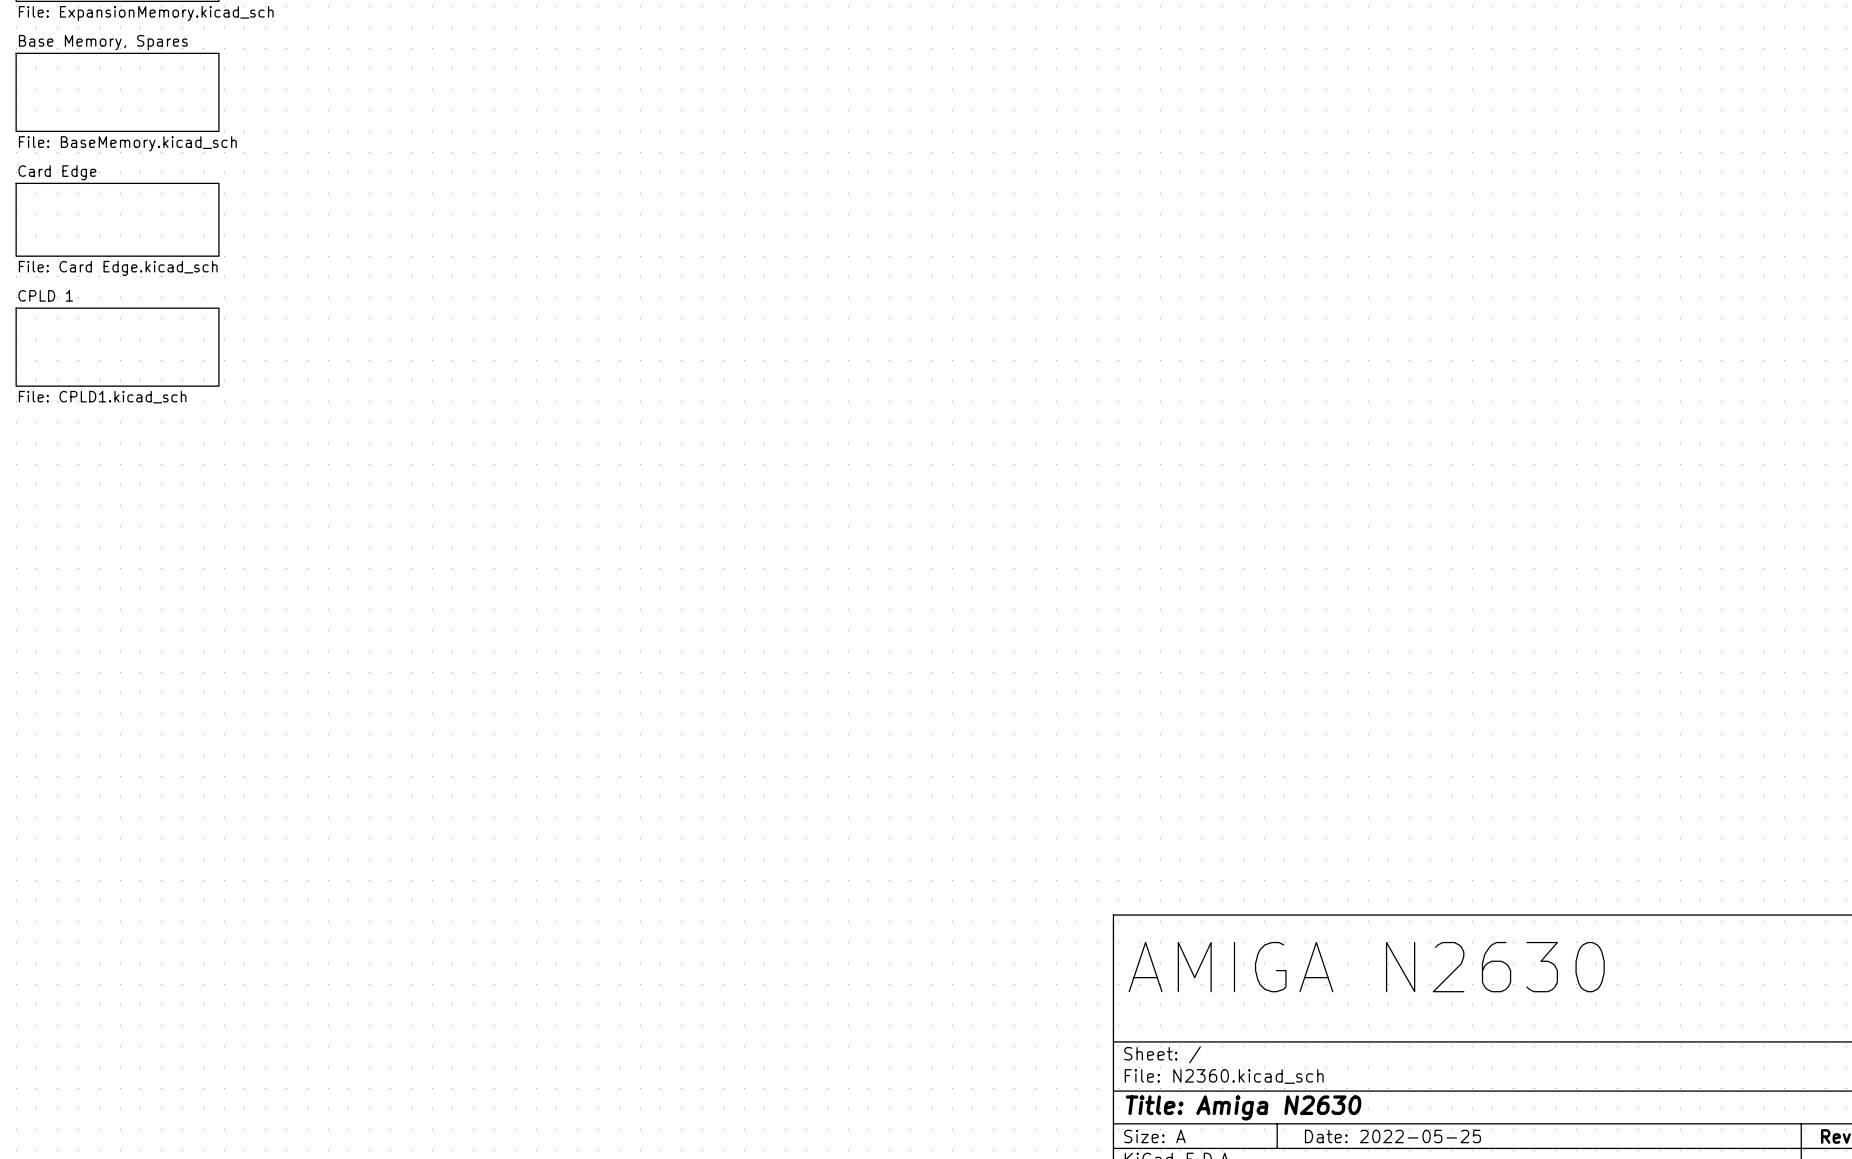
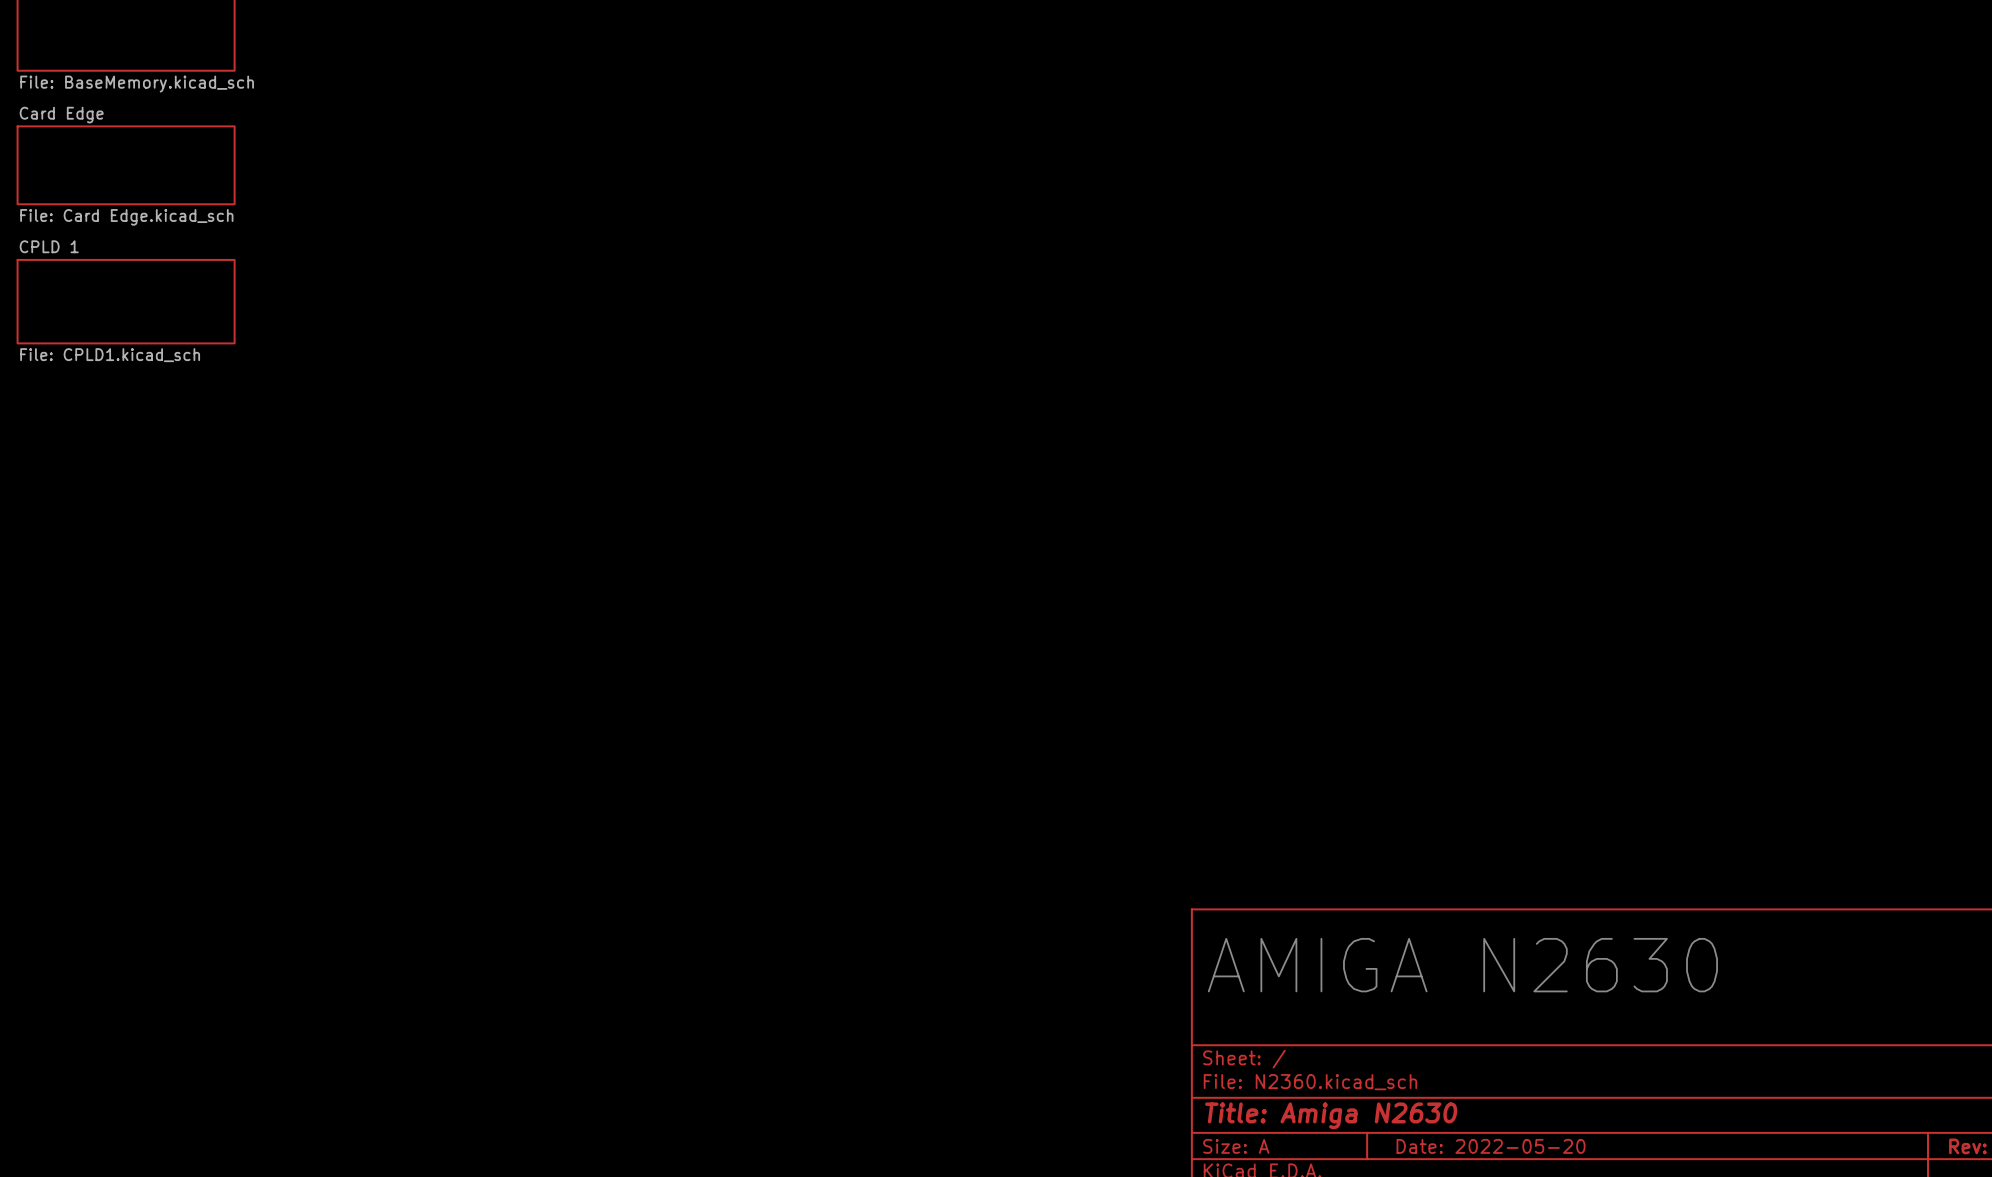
title block: Date: 2022-05-25 (1392, 1136) -> Date: 2022-05-20 (1491, 1146)

